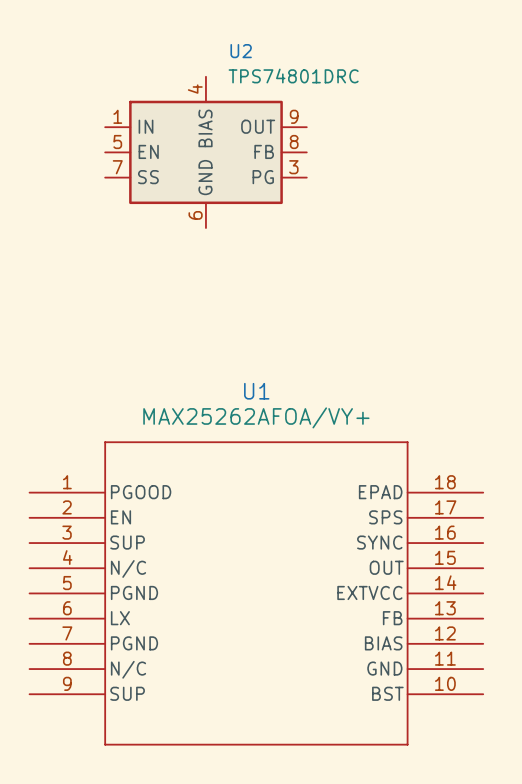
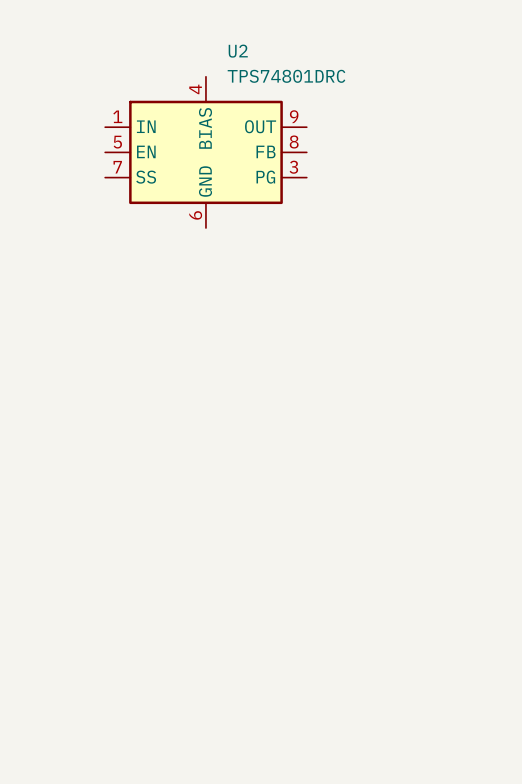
U1: MAX25262AFOA/VY+ (256, 593) -> none

